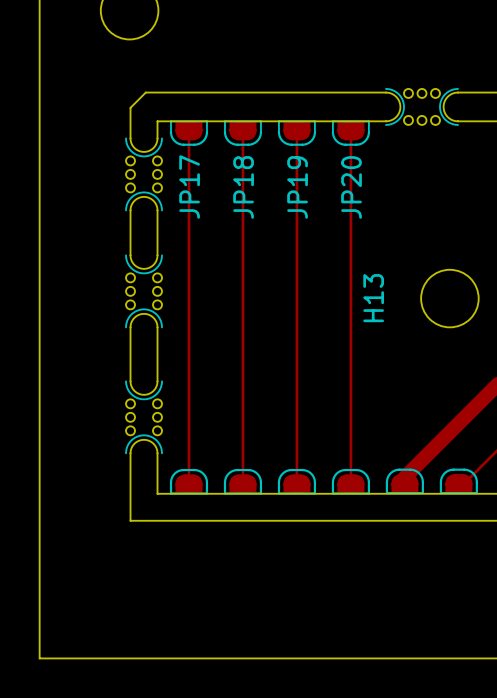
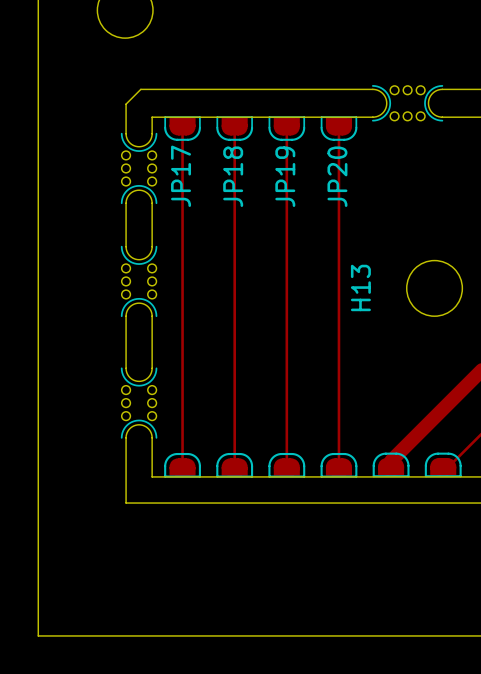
JP17 name: none -> JP17 (181, 176)
JP18 name: none -> JP18 (233, 176)
JP19 name: none -> JP19 (285, 176)
JP20 name: none -> JP20 (337, 176)
text: JP17 (189, 187) -> none
text: JP18 (243, 187) -> none
text: JP19 (297, 187) -> none
text: JP20 (351, 187) -> none

